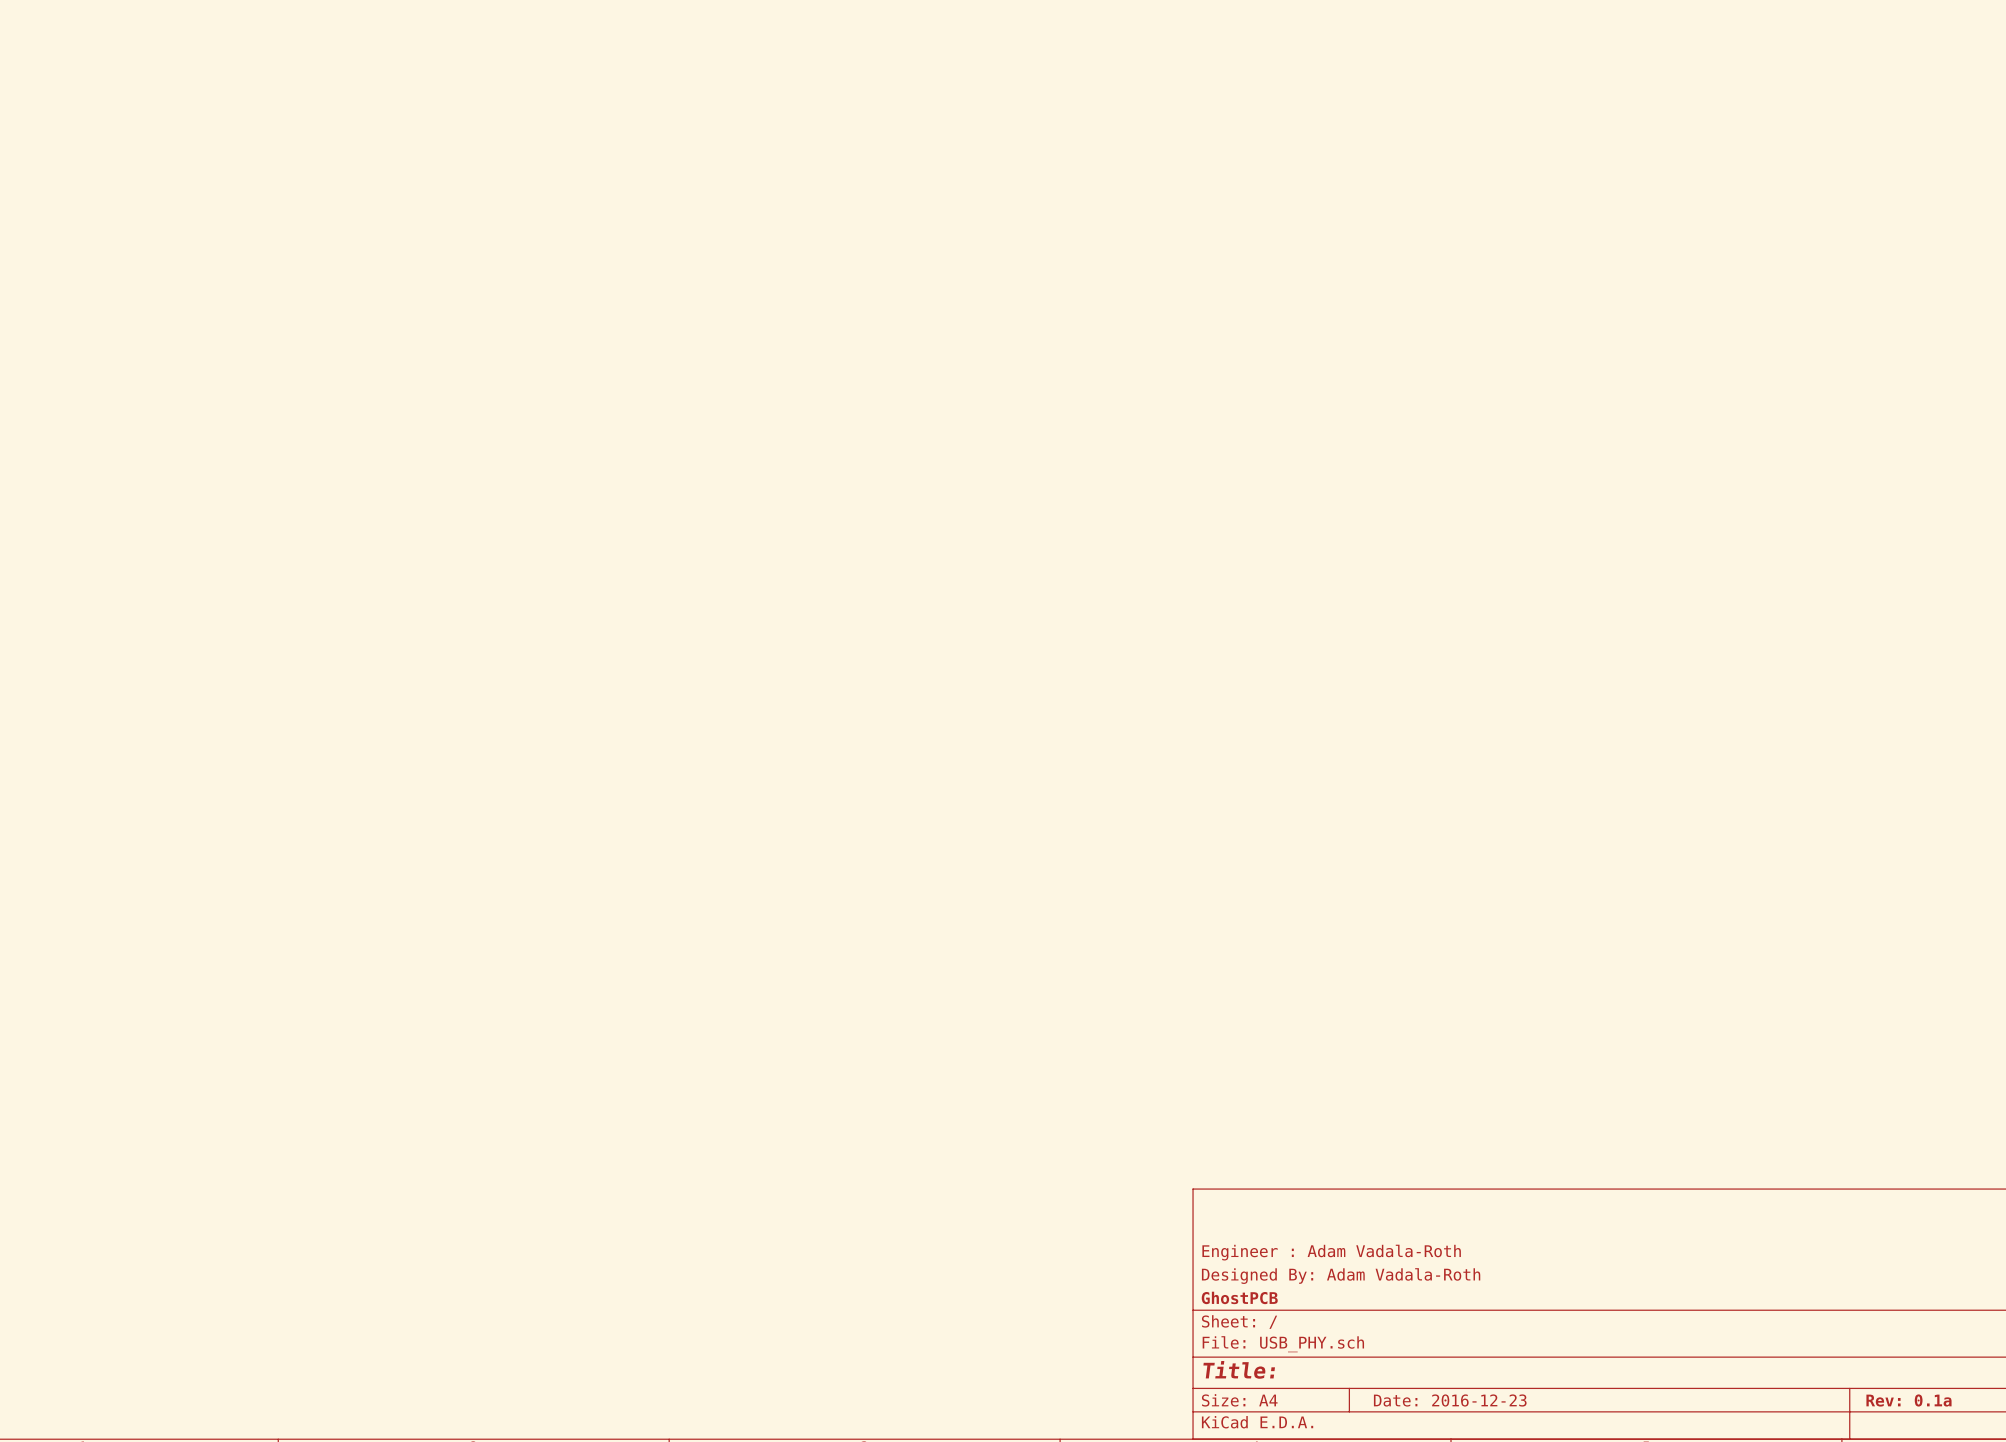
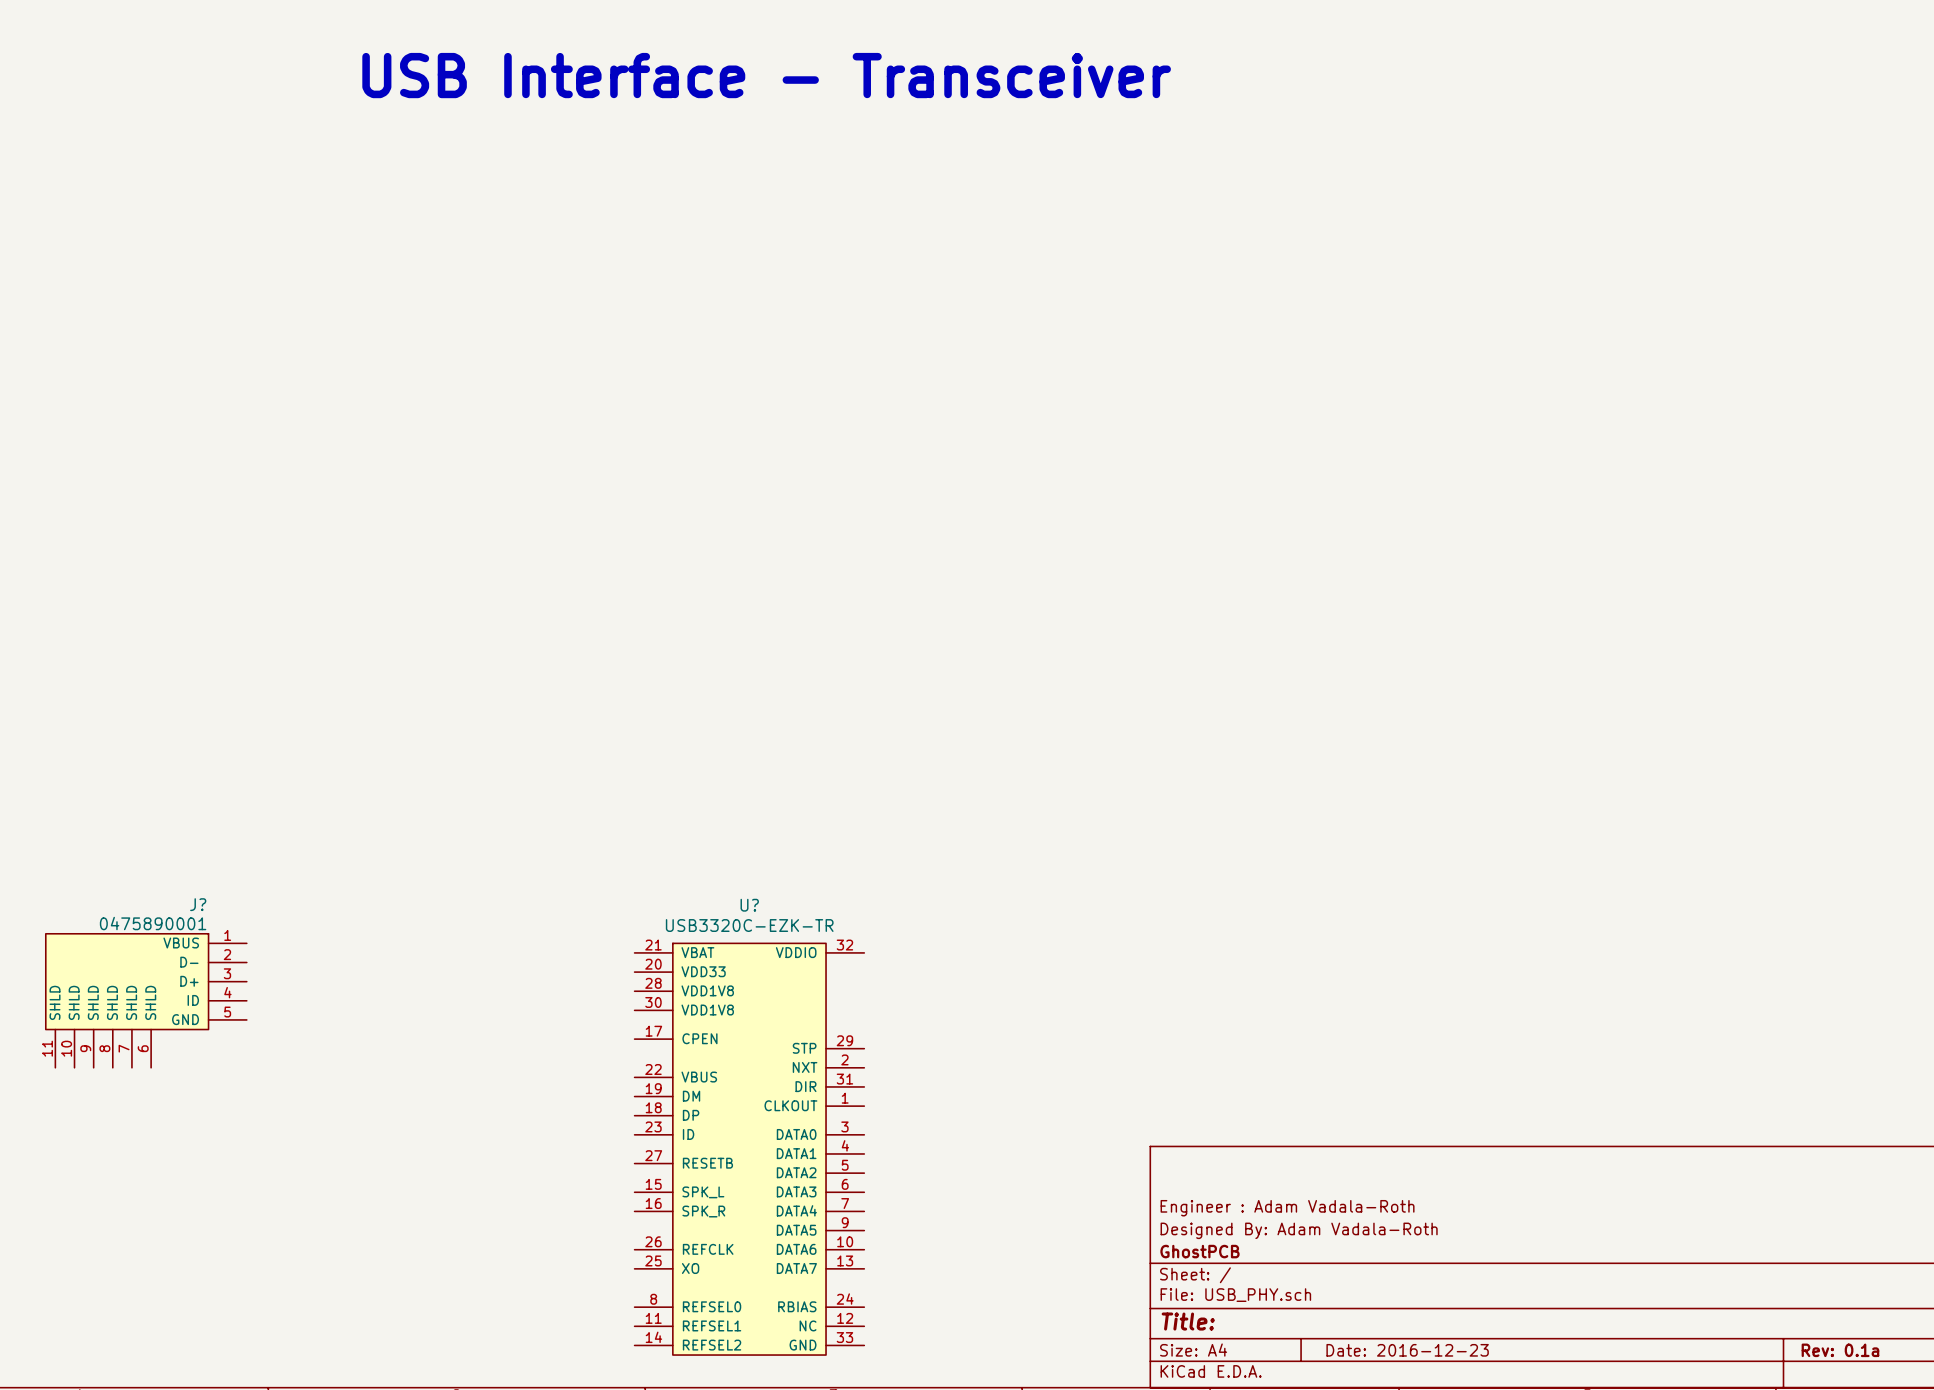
text: none -> USB Interface - Transceiver (766, 75)
J?: none -> 0475890001 (146, 1000)
U?: none -> USB3320C-EZK-TR (749, 1149)

